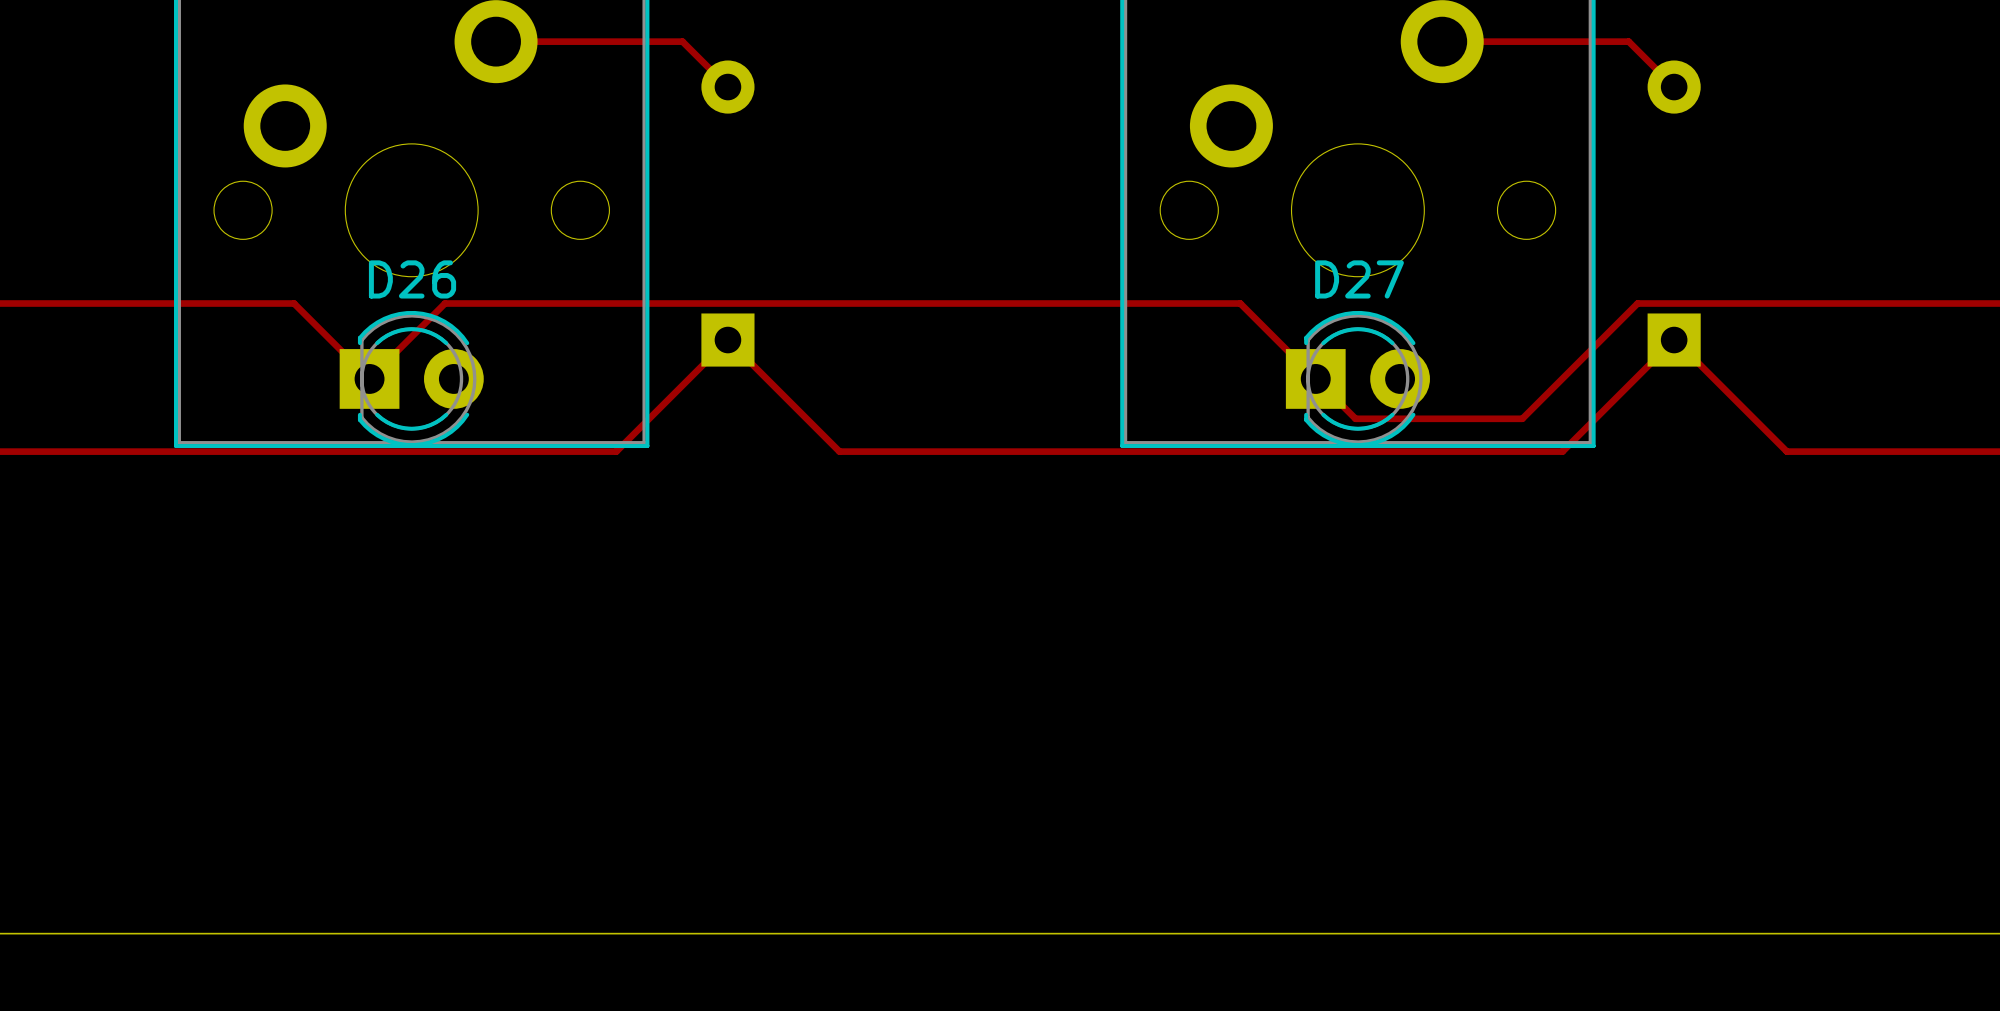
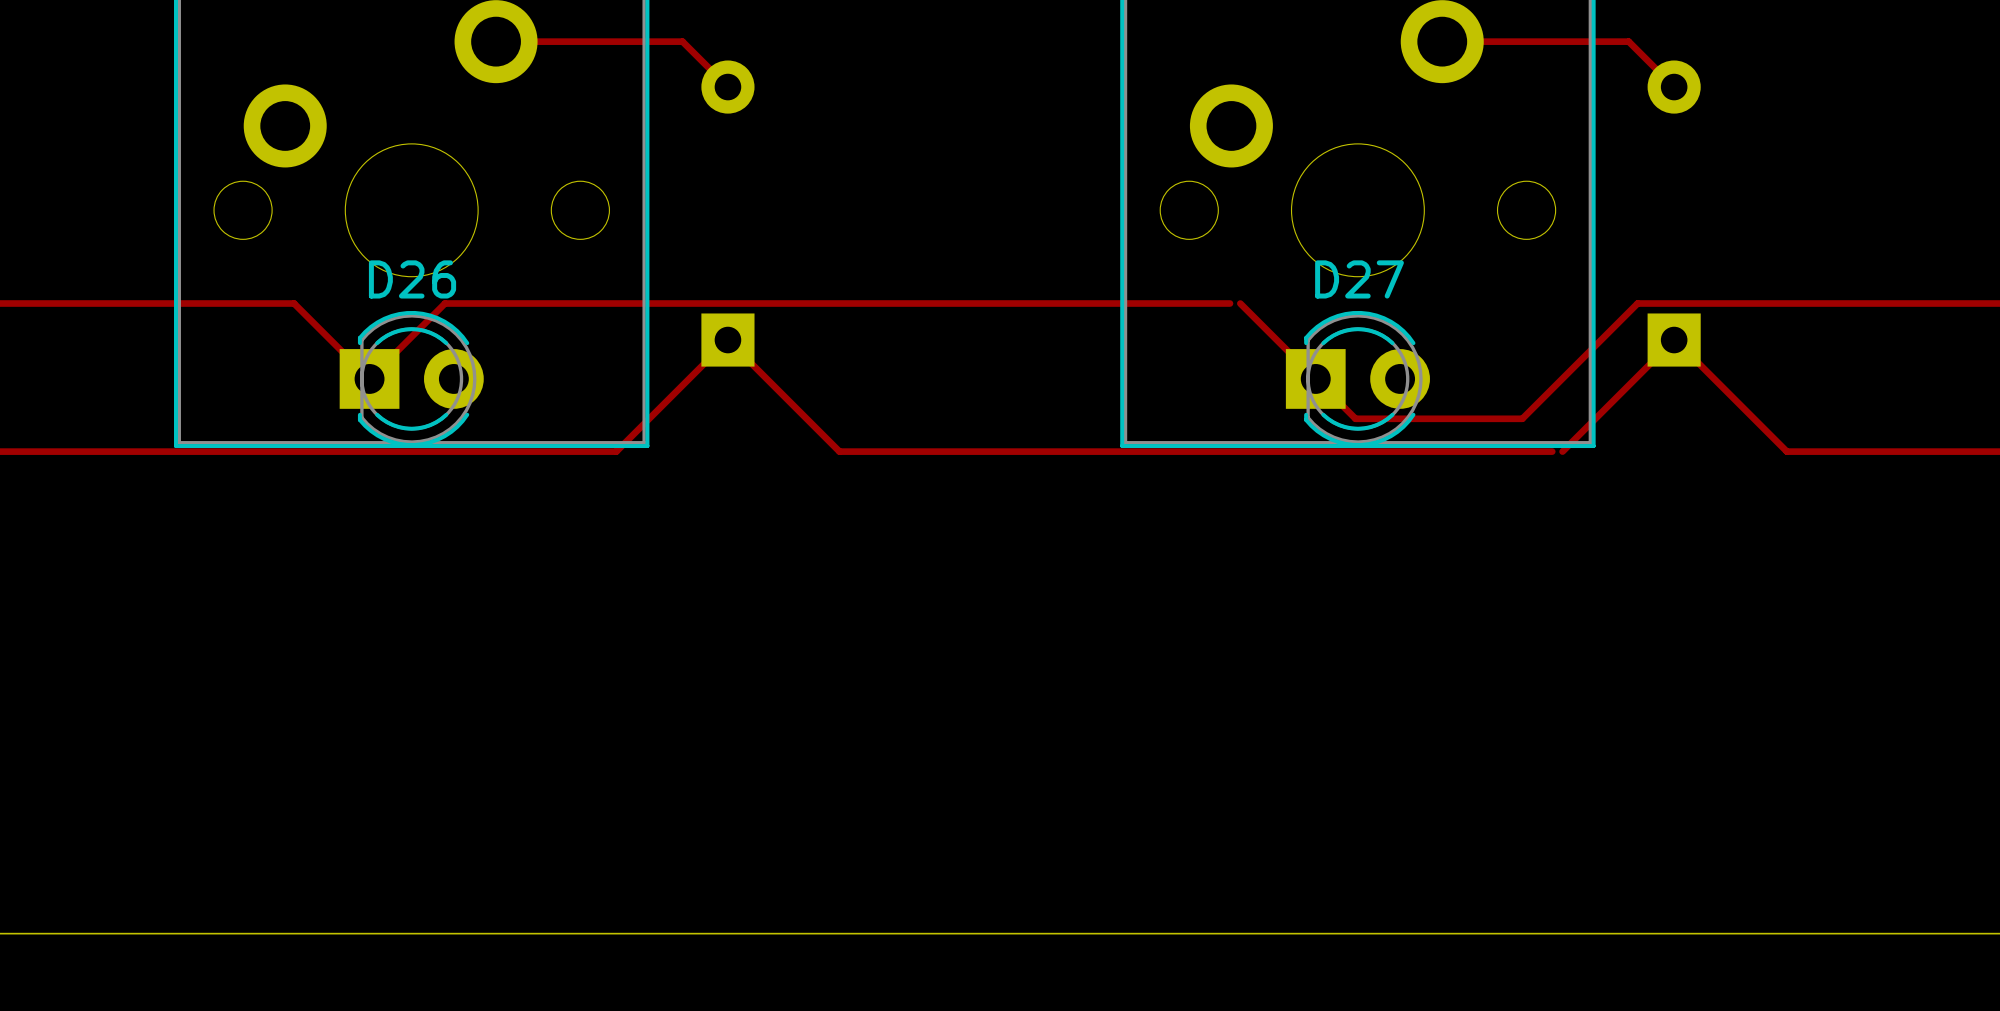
track: (1230, 303) (1240, 303) -> none
track: (1552, 451) (1562, 451) -> none

